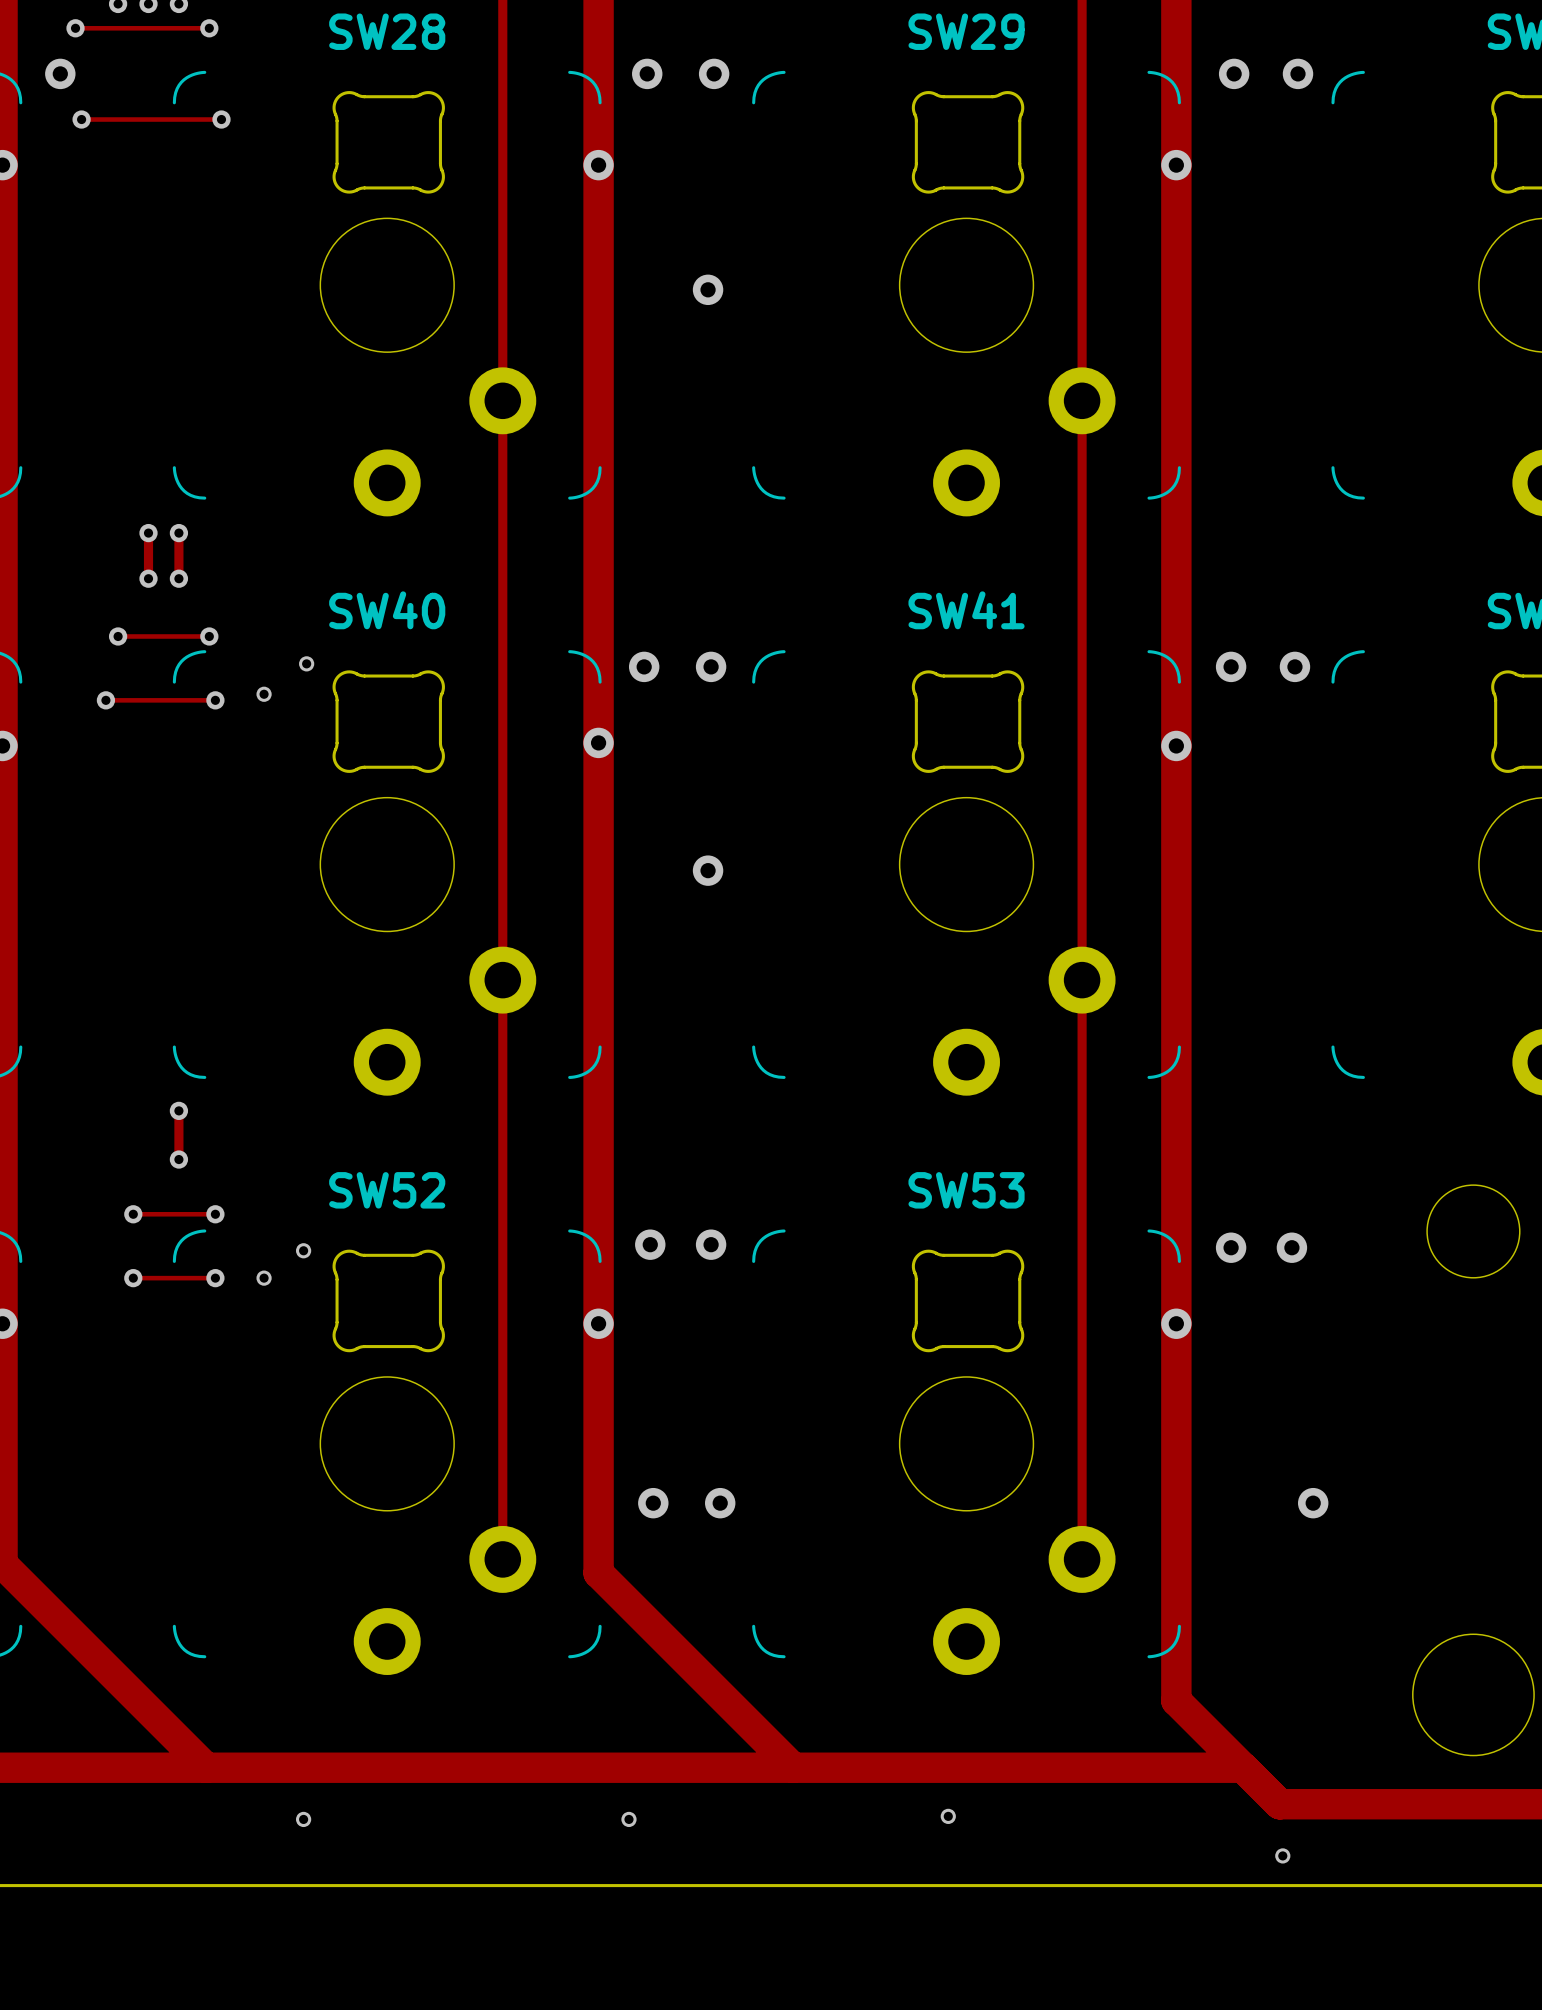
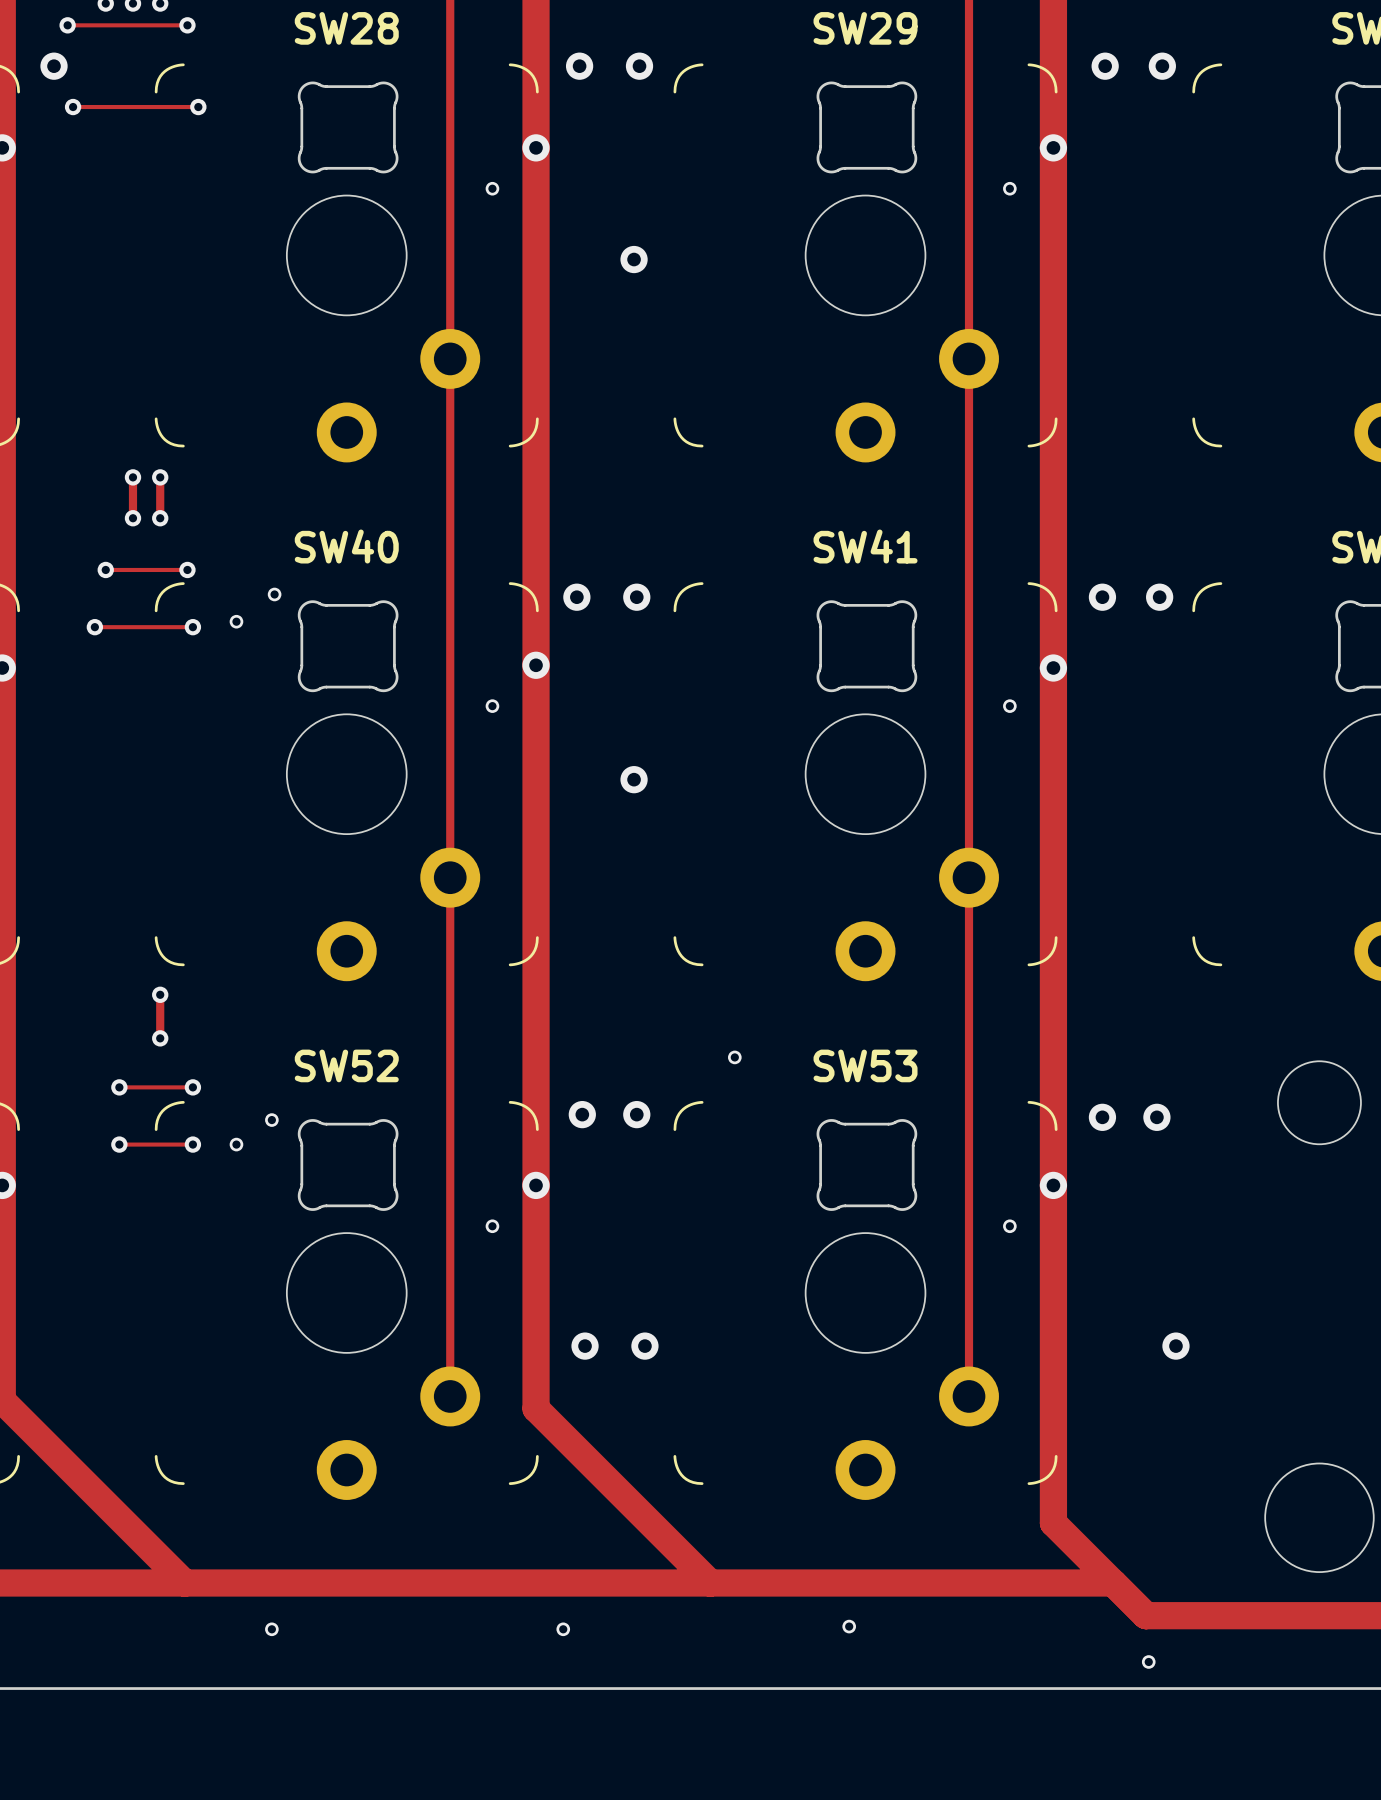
via: none -> (492, 188)
via: none -> (1009, 188)
via: none -> (492, 706)
via: none -> (1009, 706)
via: none -> (734, 1057)
via: none -> (492, 1226)
via: none -> (1009, 1226)

